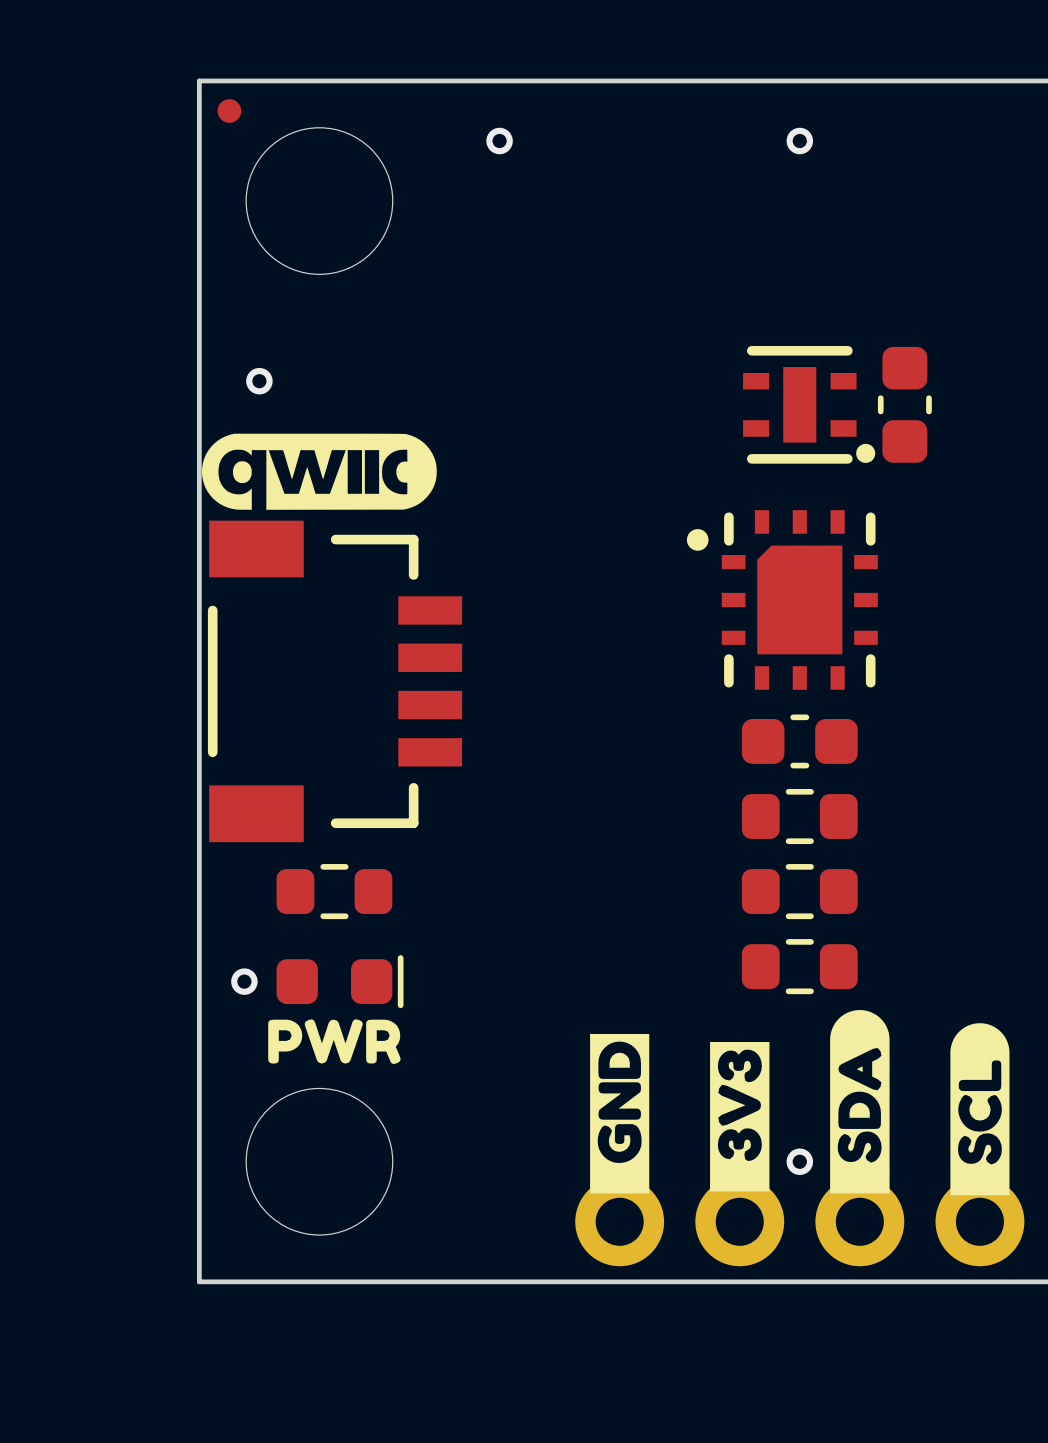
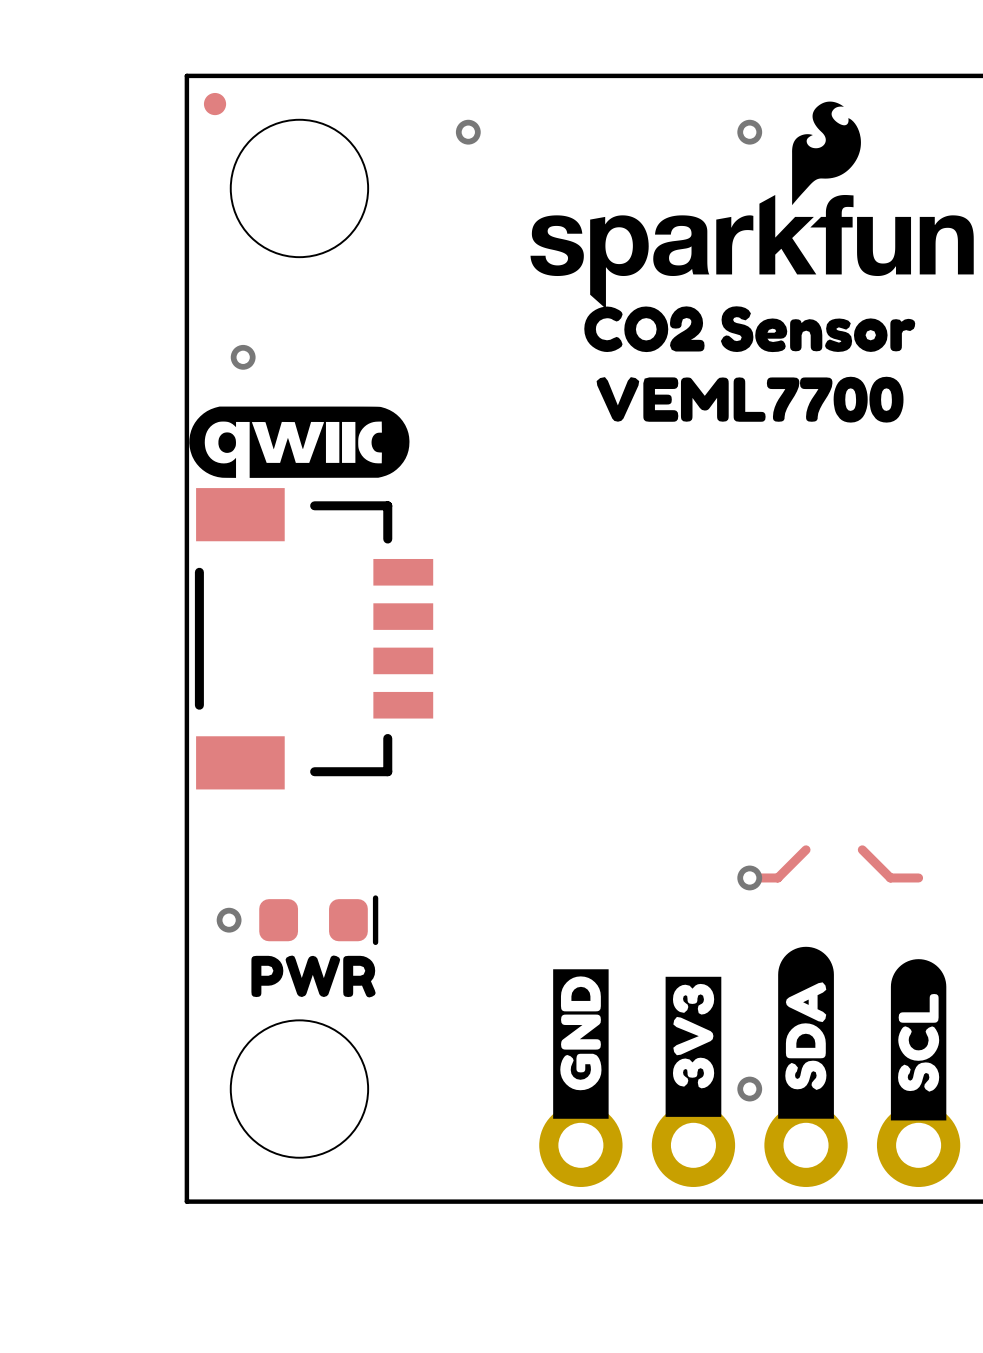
drawing: none -> [530, 101, 974, 423]
part: (809, 404) -> none
part: (904, 404) -> none
part: (782, 599) -> none
part: (799, 741) -> none
part: (799, 816) -> none
part: (334, 891) -> none
part: (799, 891) -> none
track: none -> (806, 849) (777, 877) (749, 877)
track: none -> (862, 849) (890, 877) (918, 877)
via: none -> (749, 877)
part: (799, 966) -> none

